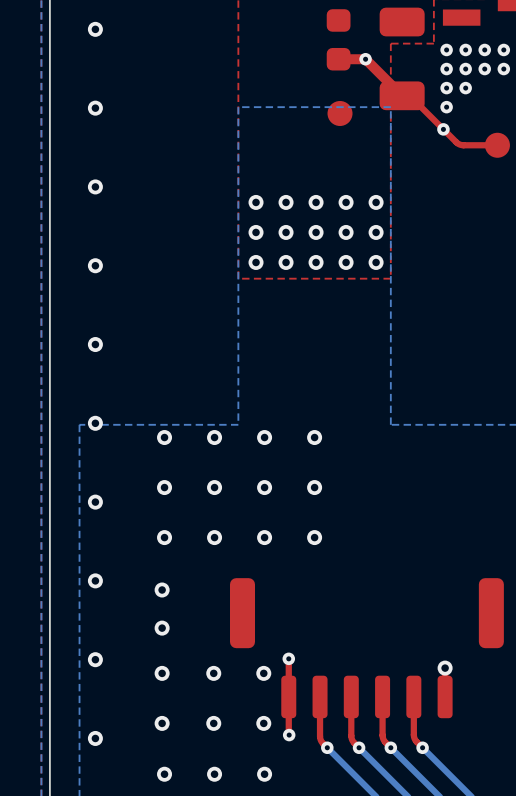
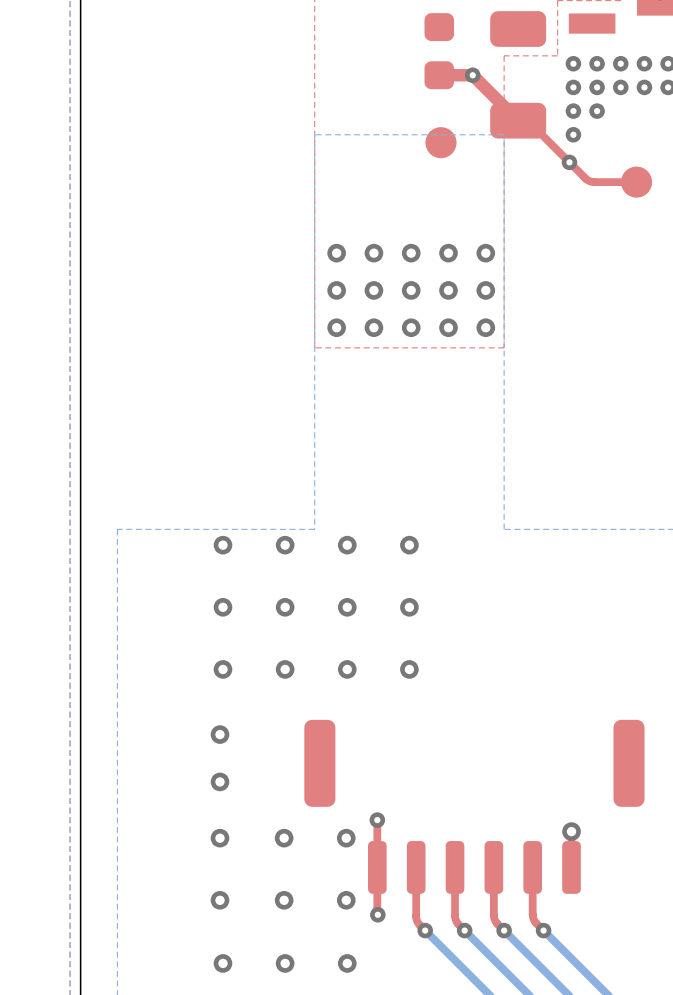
via: (95, 29) -> none
via: (95, 108) -> none
via: (95, 186) -> none
via: (95, 265) -> none
via: (95, 344) -> none
via: (95, 423) -> none
via: (95, 502) -> none
via: (95, 580) -> none
via: (95, 659) -> none
via: (95, 738) -> none

